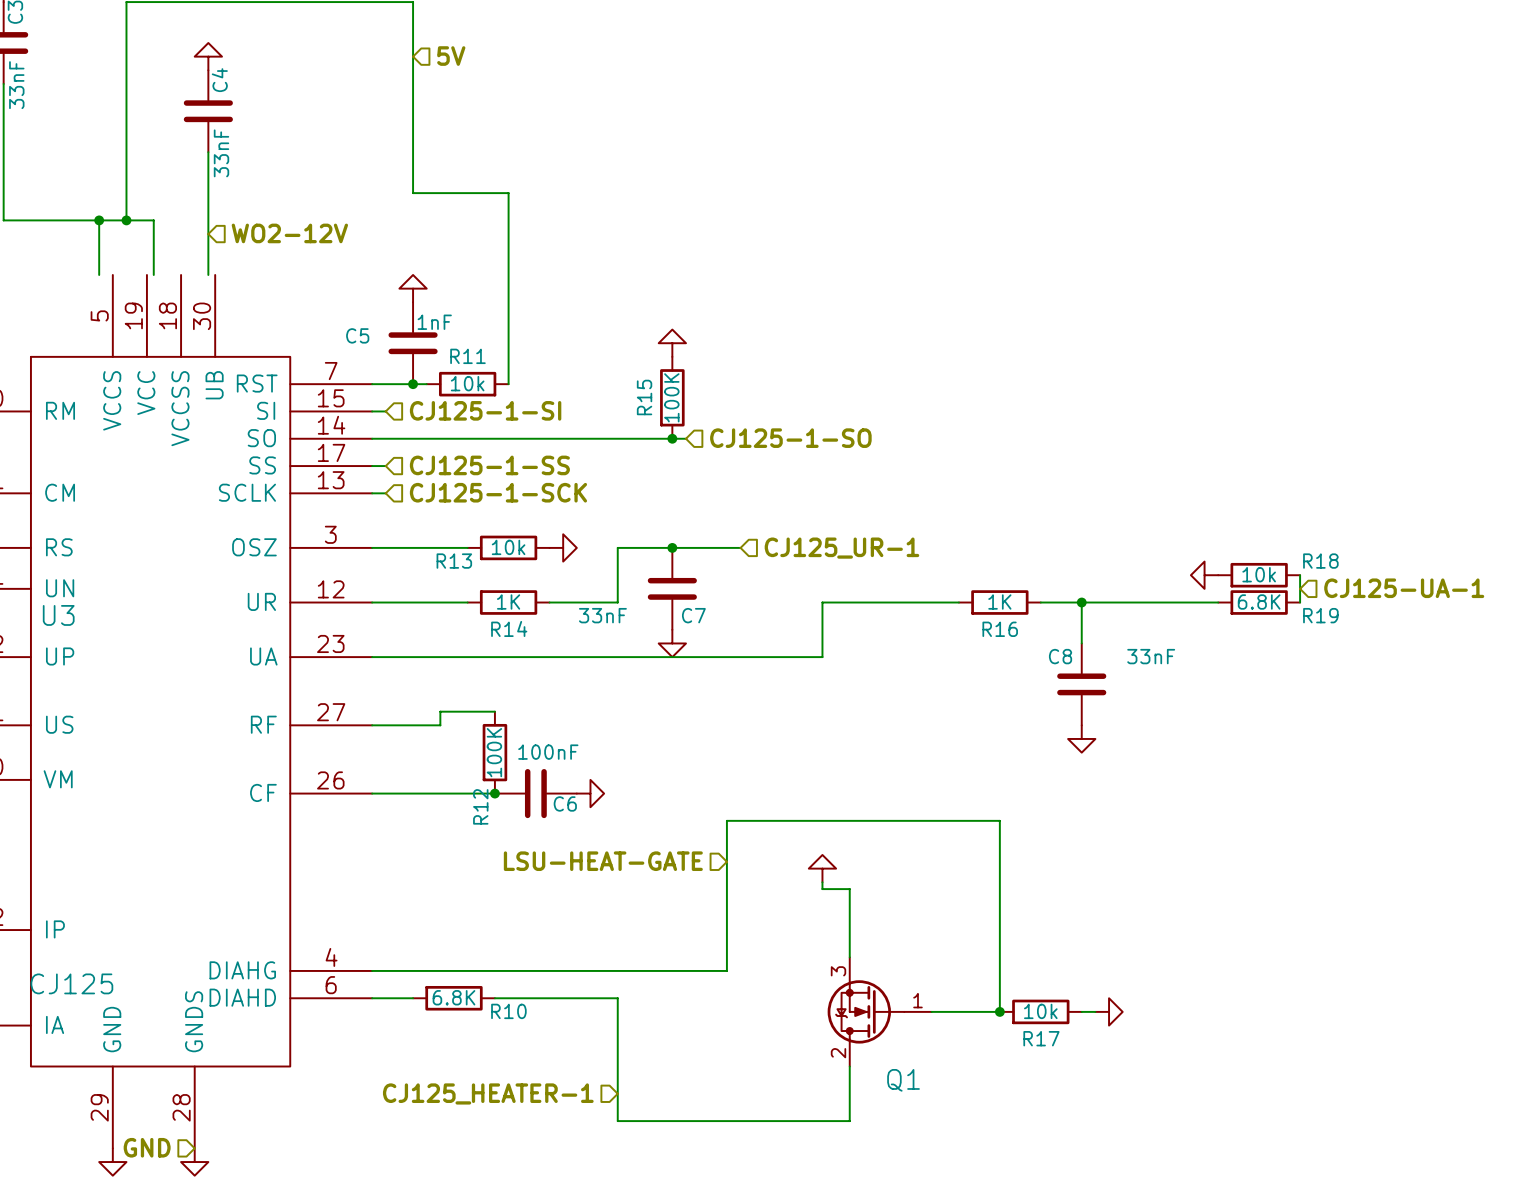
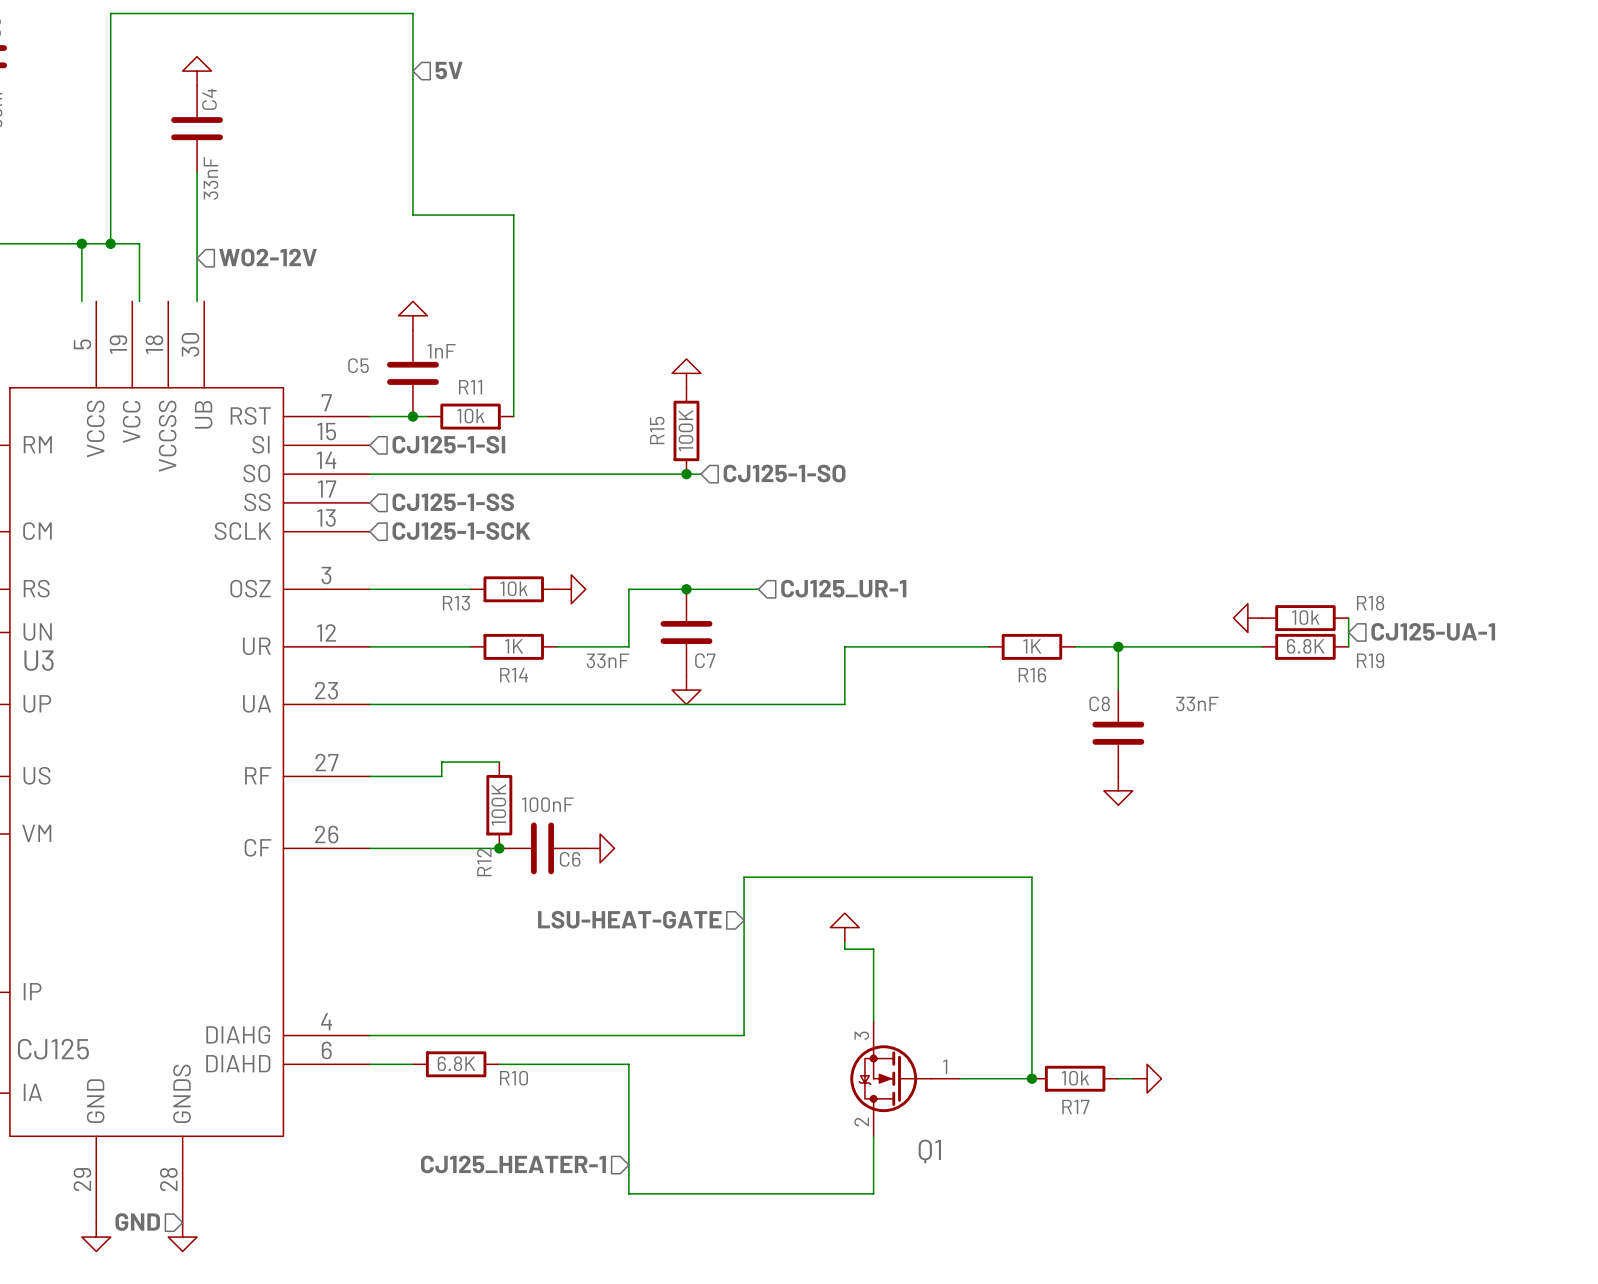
hierarchical label position: CJ125-1-SI (485, 410) -> CJ125-1-SI (448, 444)
wire: (372, 411) (385, 411) -> none
hierarchical label position: CJ125-1-SS (489, 465) -> CJ125-1-SS (453, 502)
wire: (372, 466) (385, 466) -> none
hierarchical label position: CJ125-1-SCK (498, 492) -> CJ125-1-SCK (461, 531)
wire: (372, 493) (385, 493) -> none

